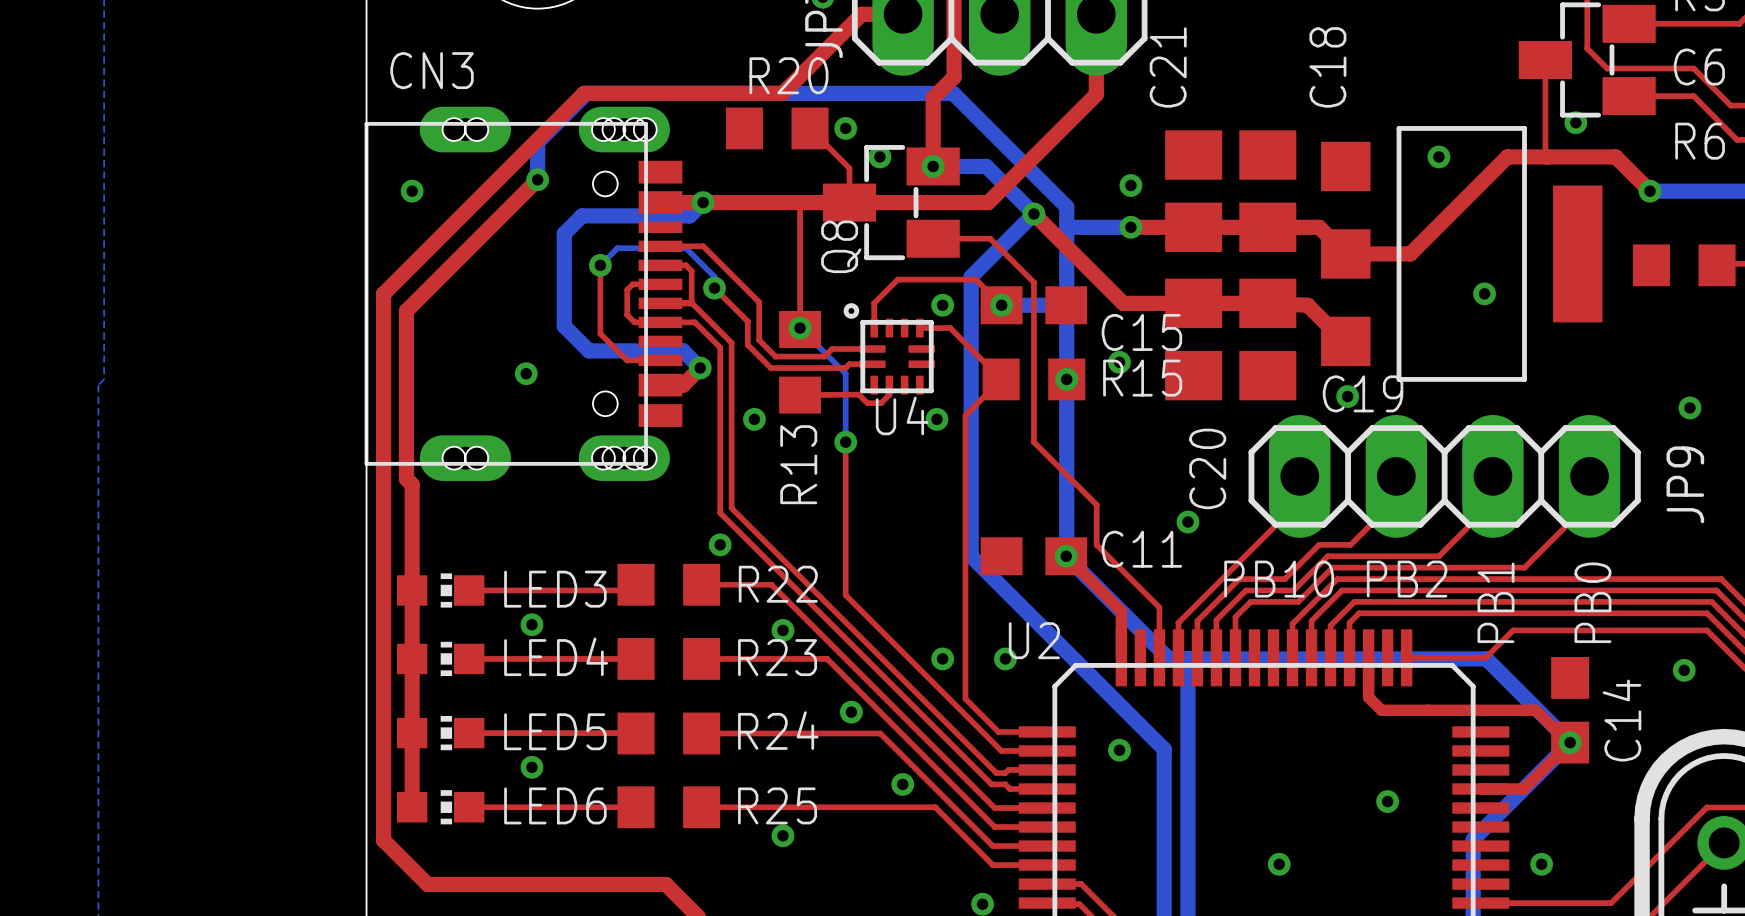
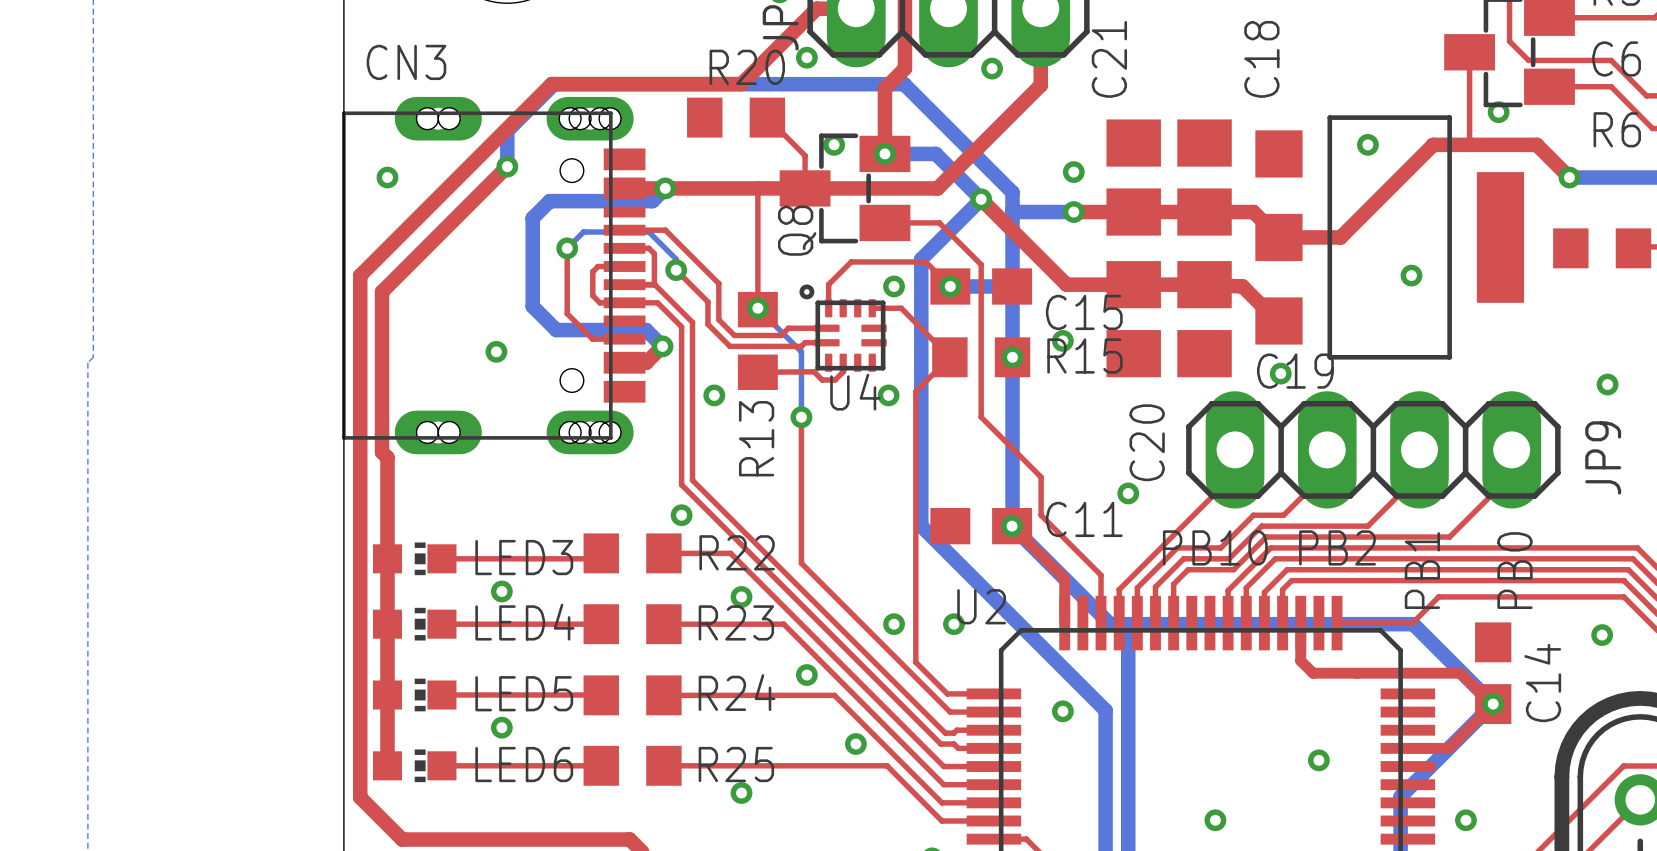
via: none -> (992, 68)
via position: (845, 128) -> (806, 57)

